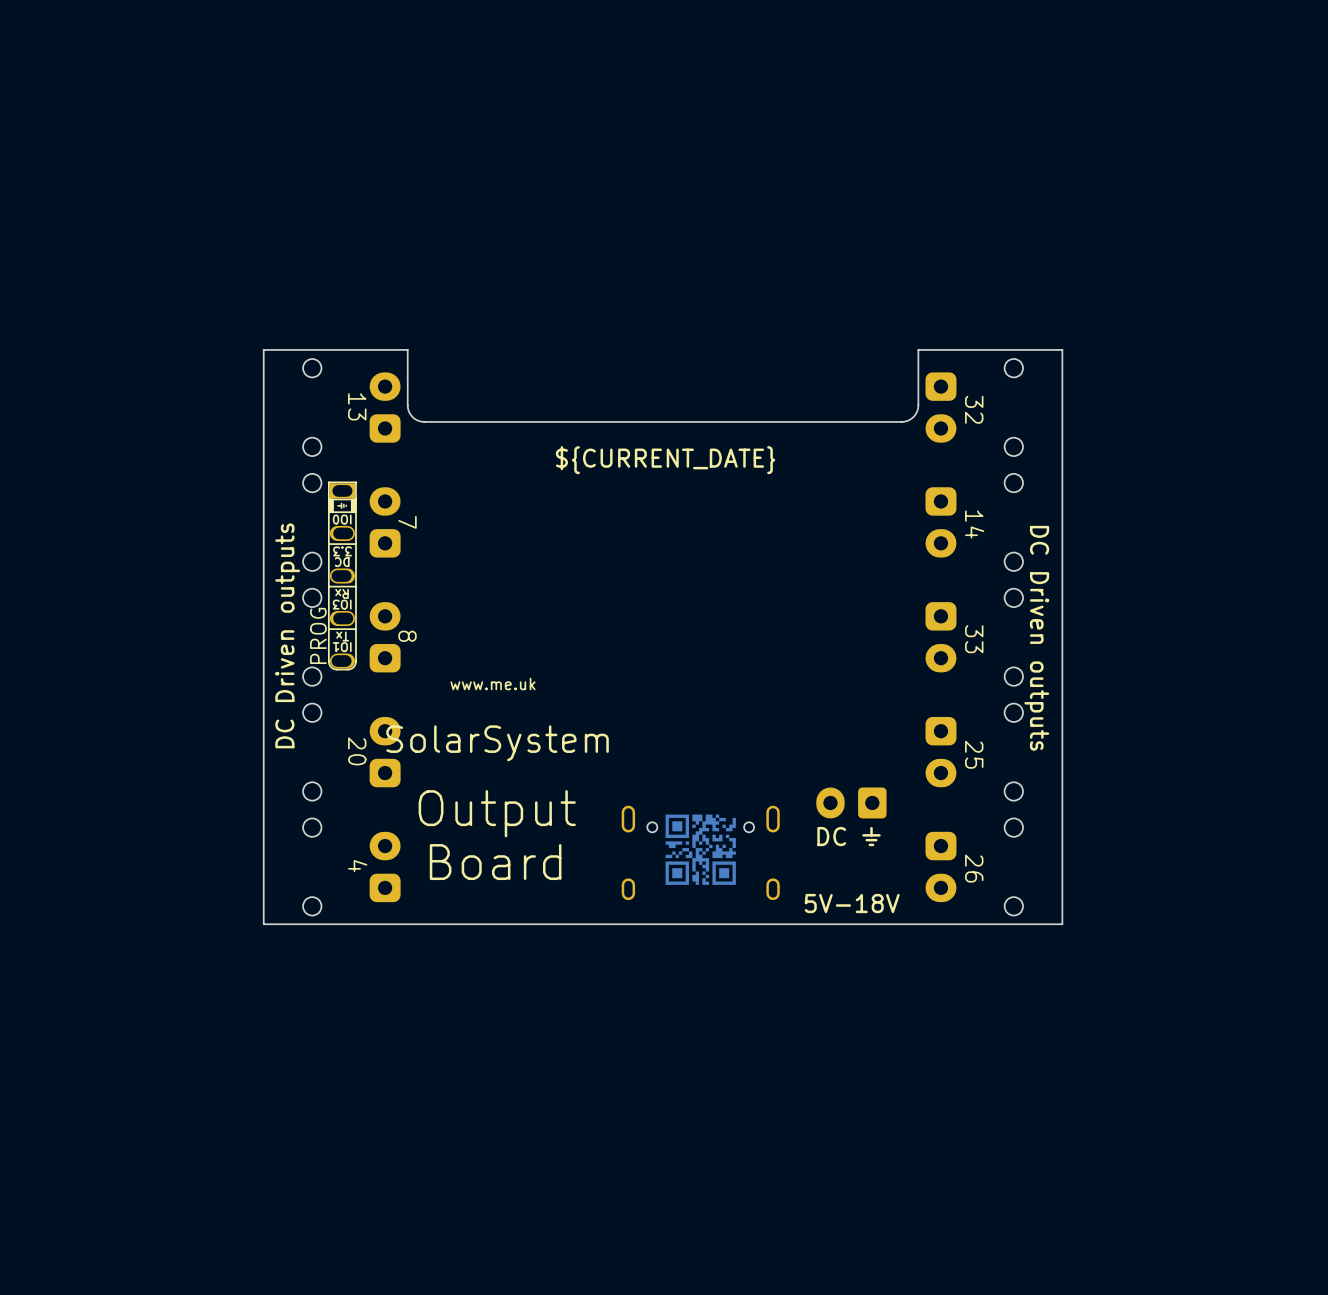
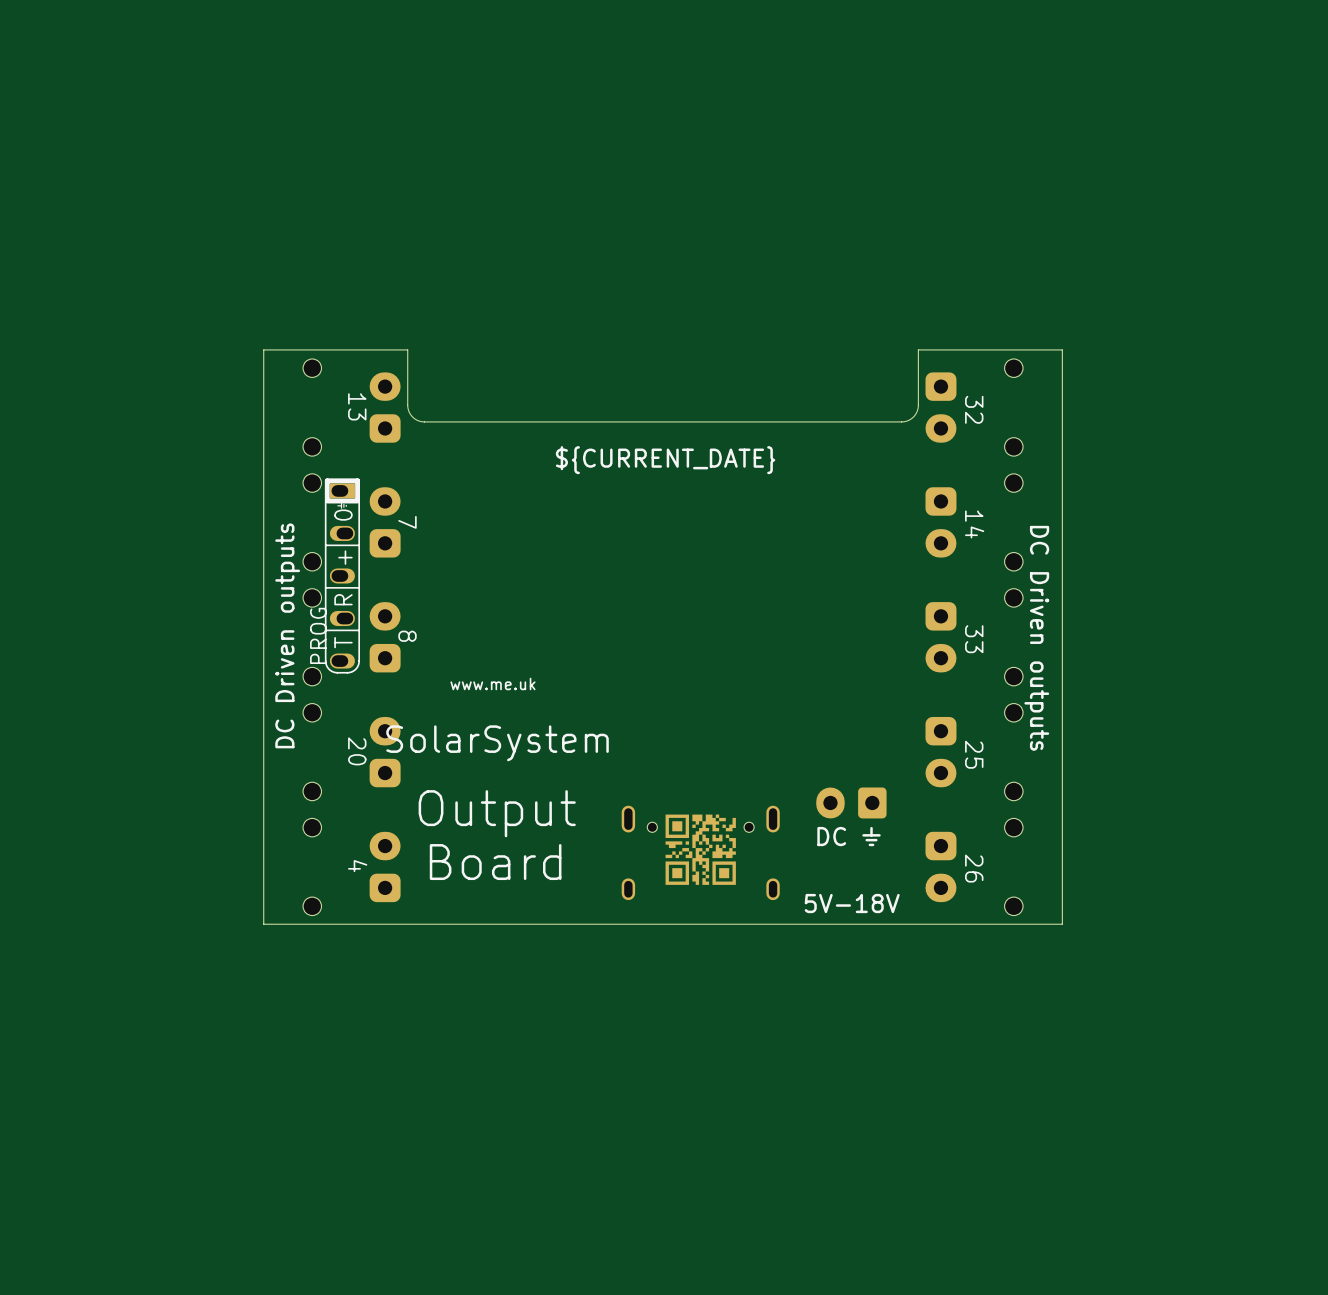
part footprint: [328, 481, 357, 671] -> [324, 478, 361, 674]

